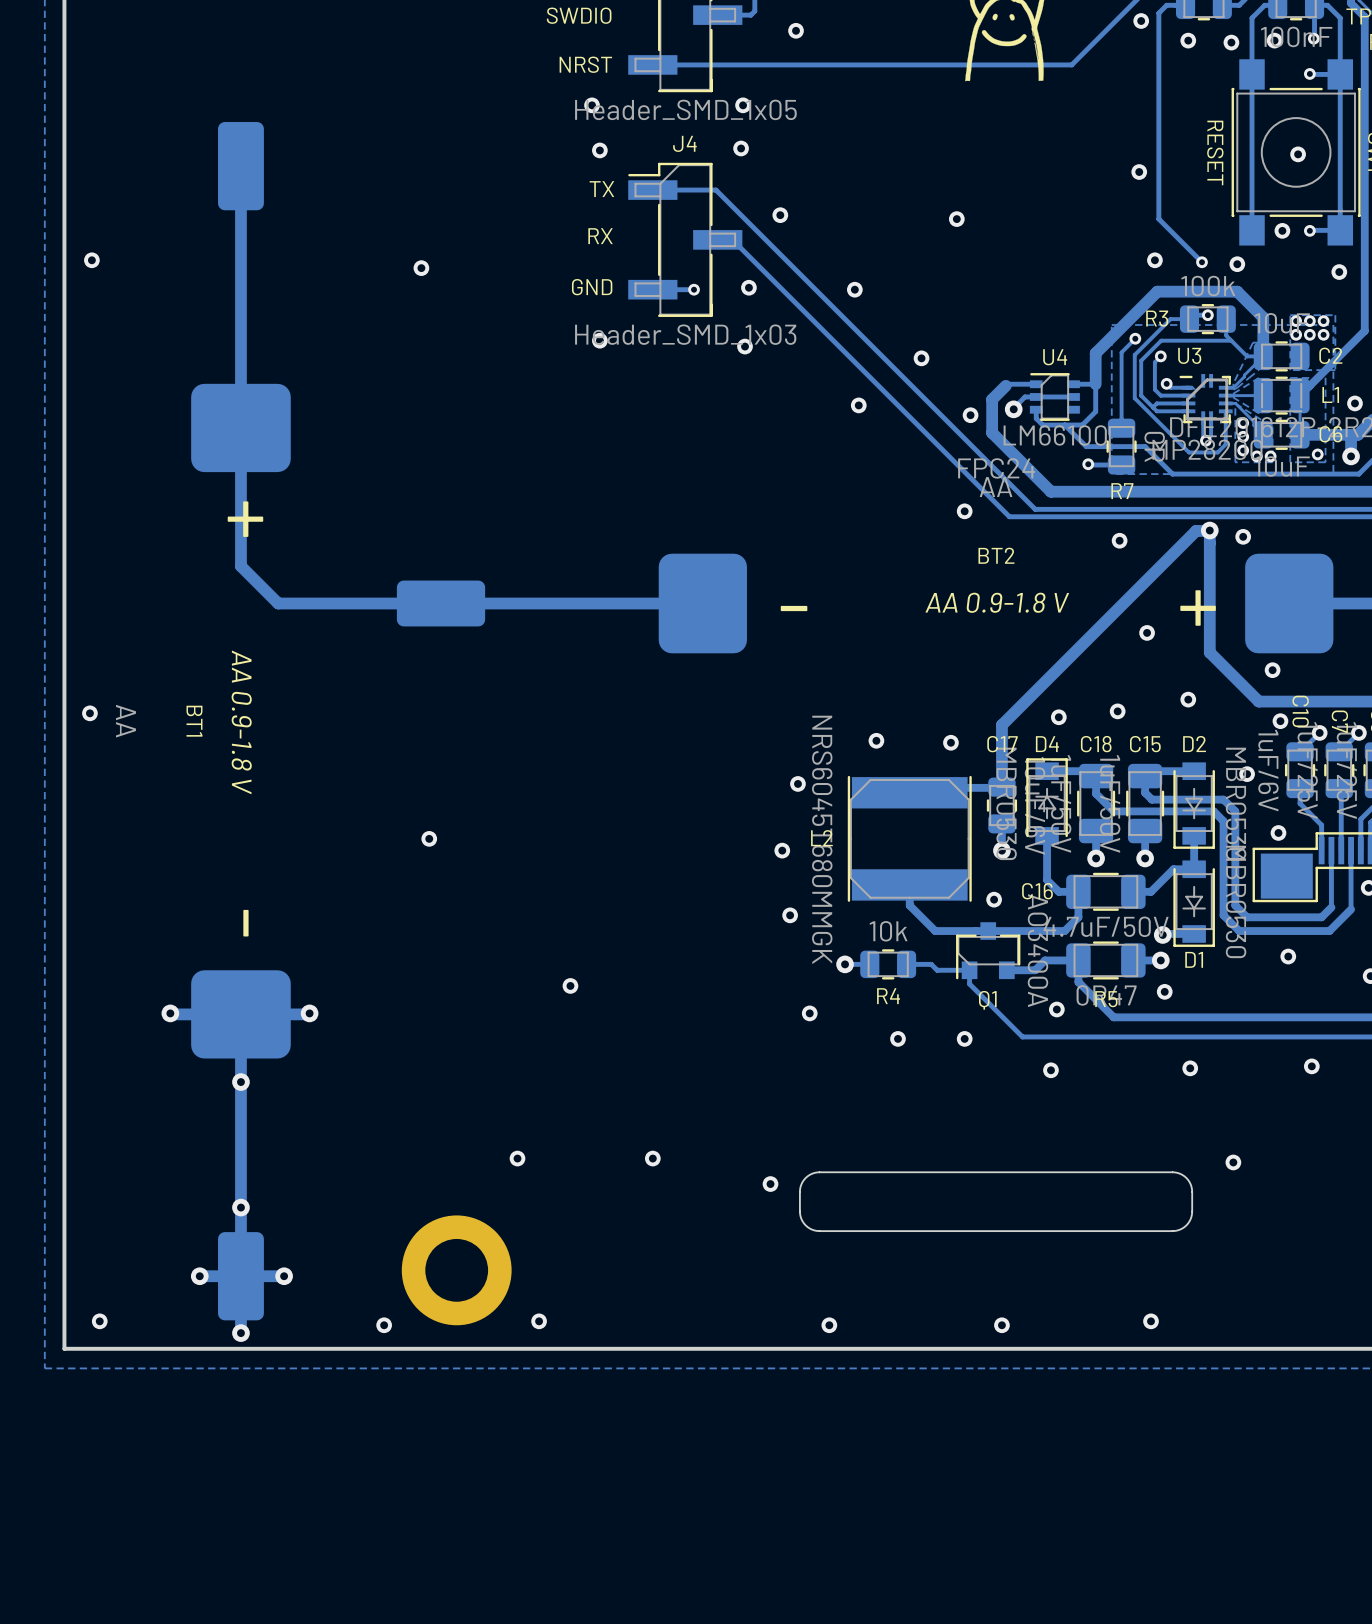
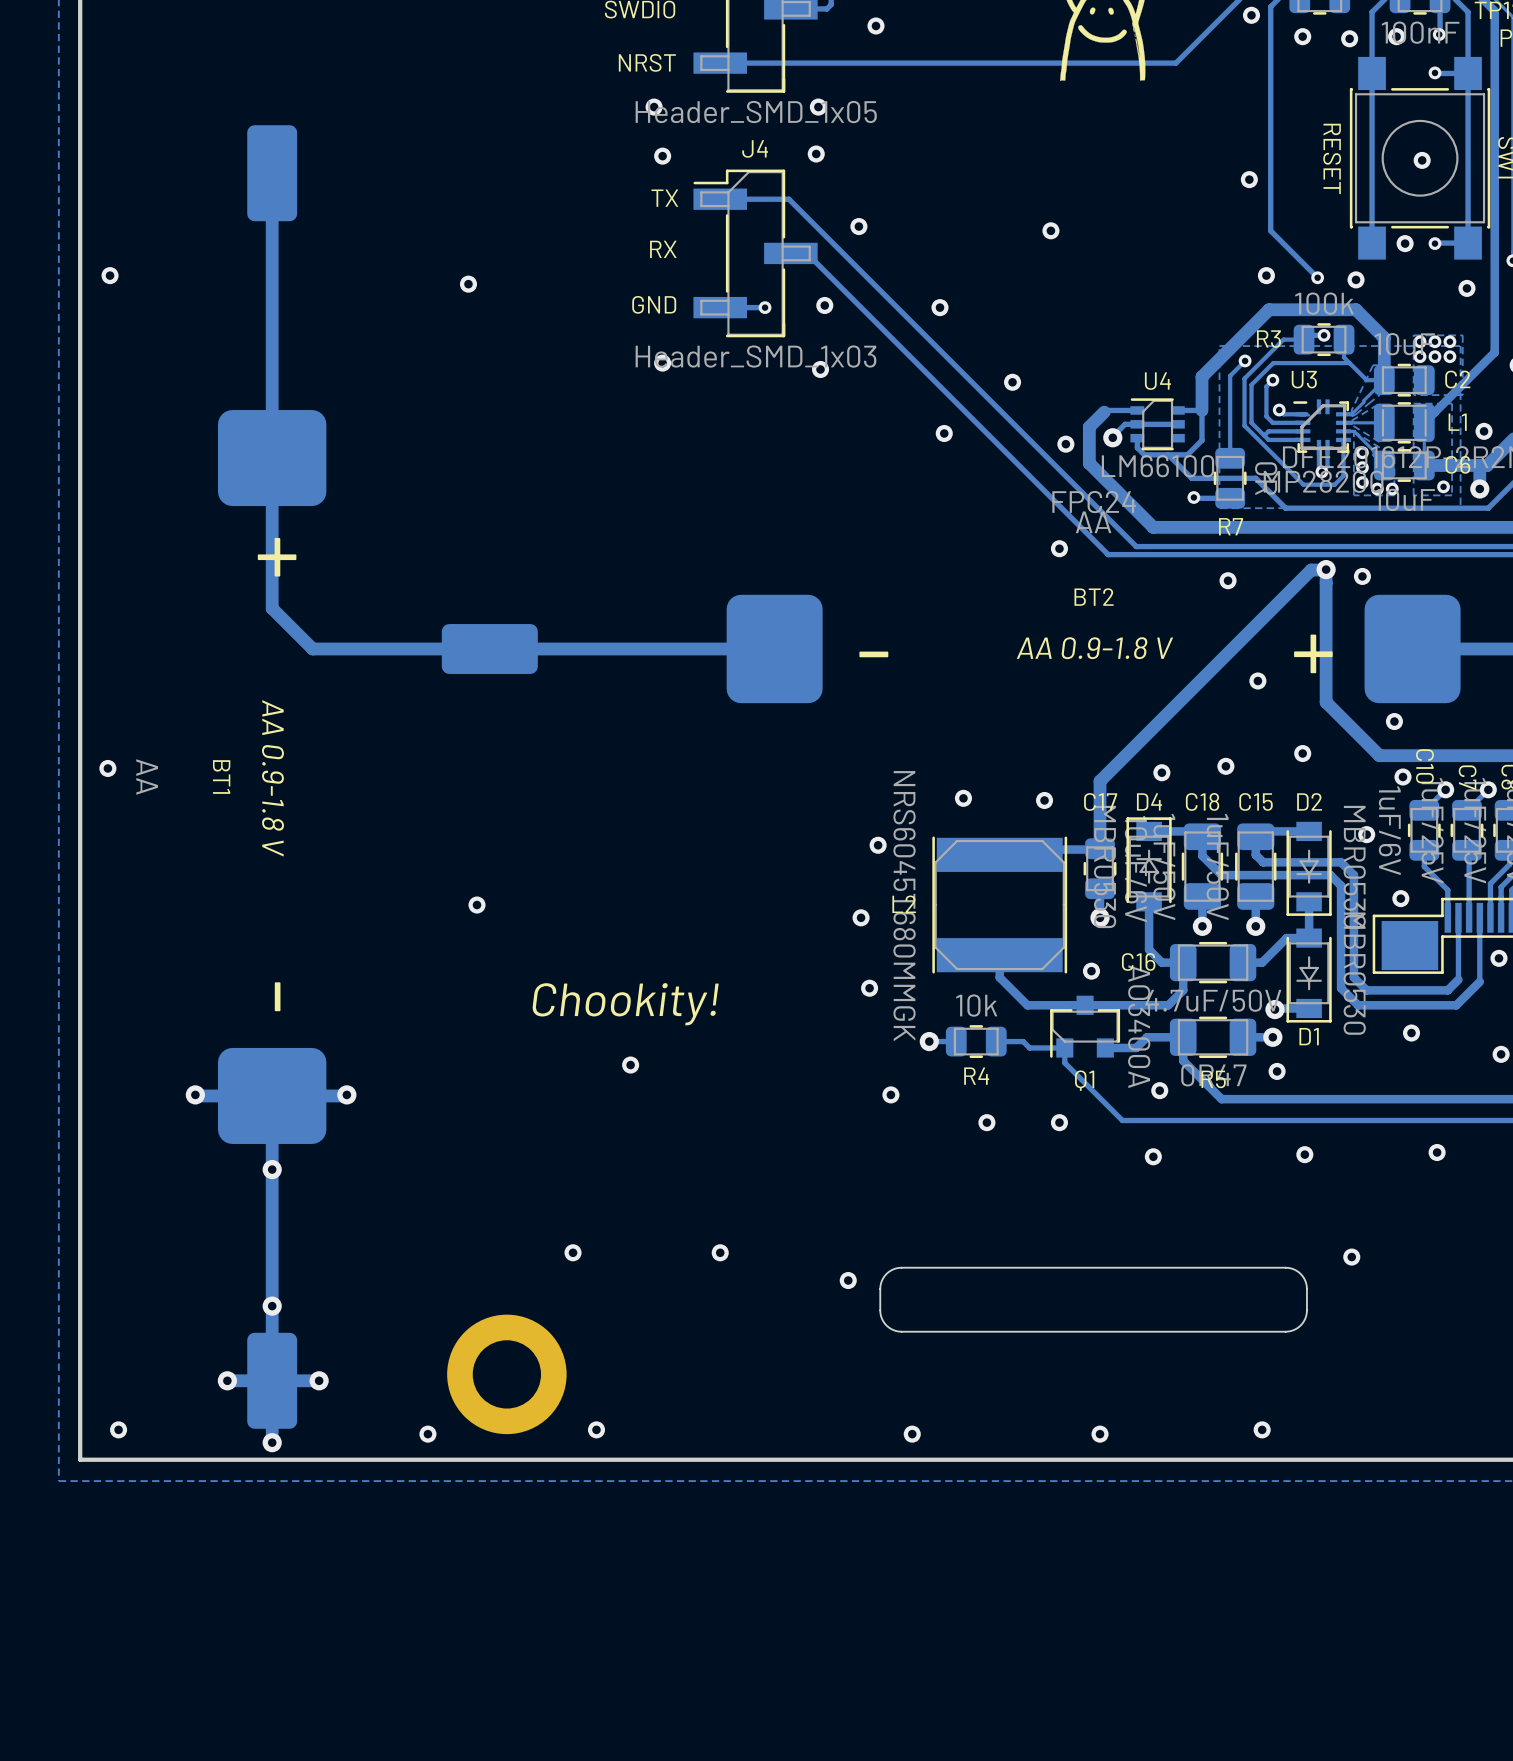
text: none -> Chookity! (625, 1004)

